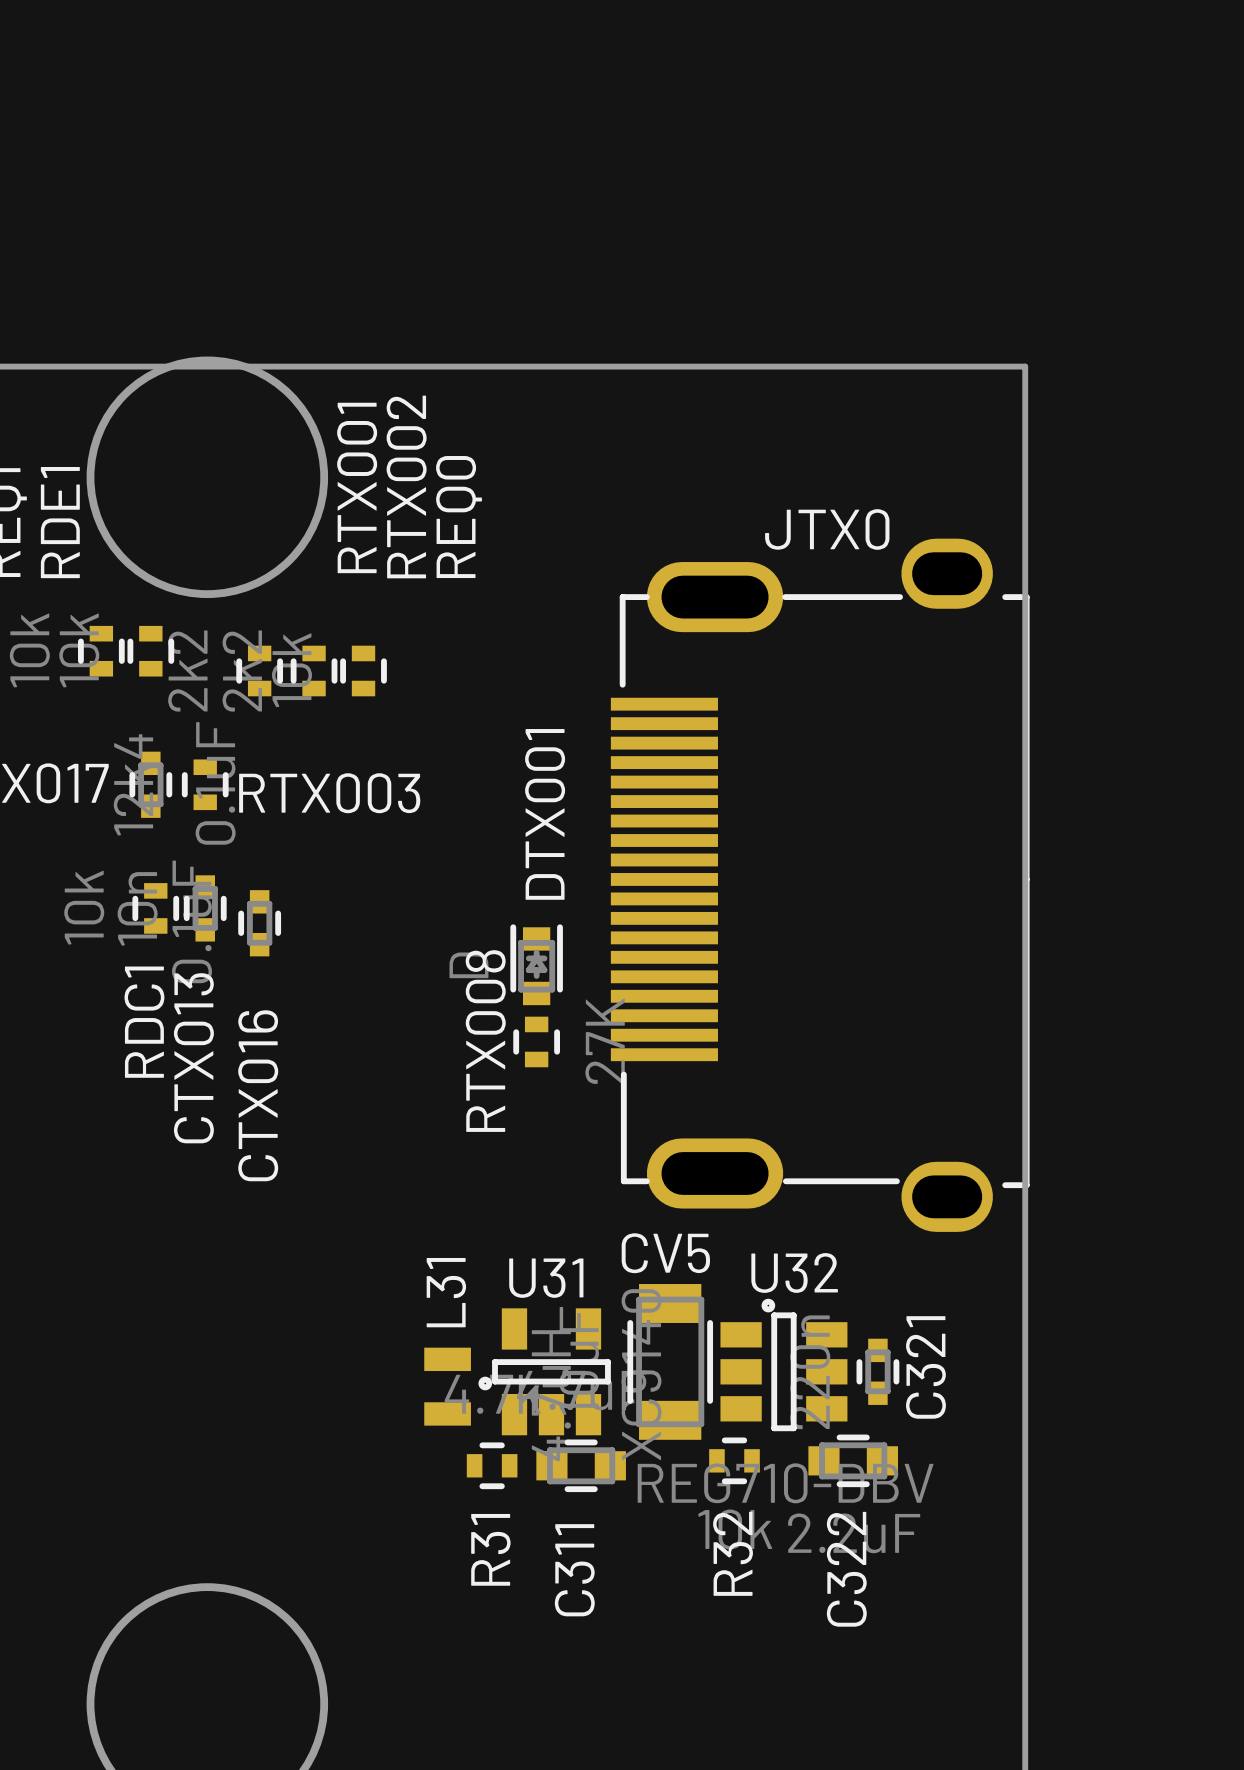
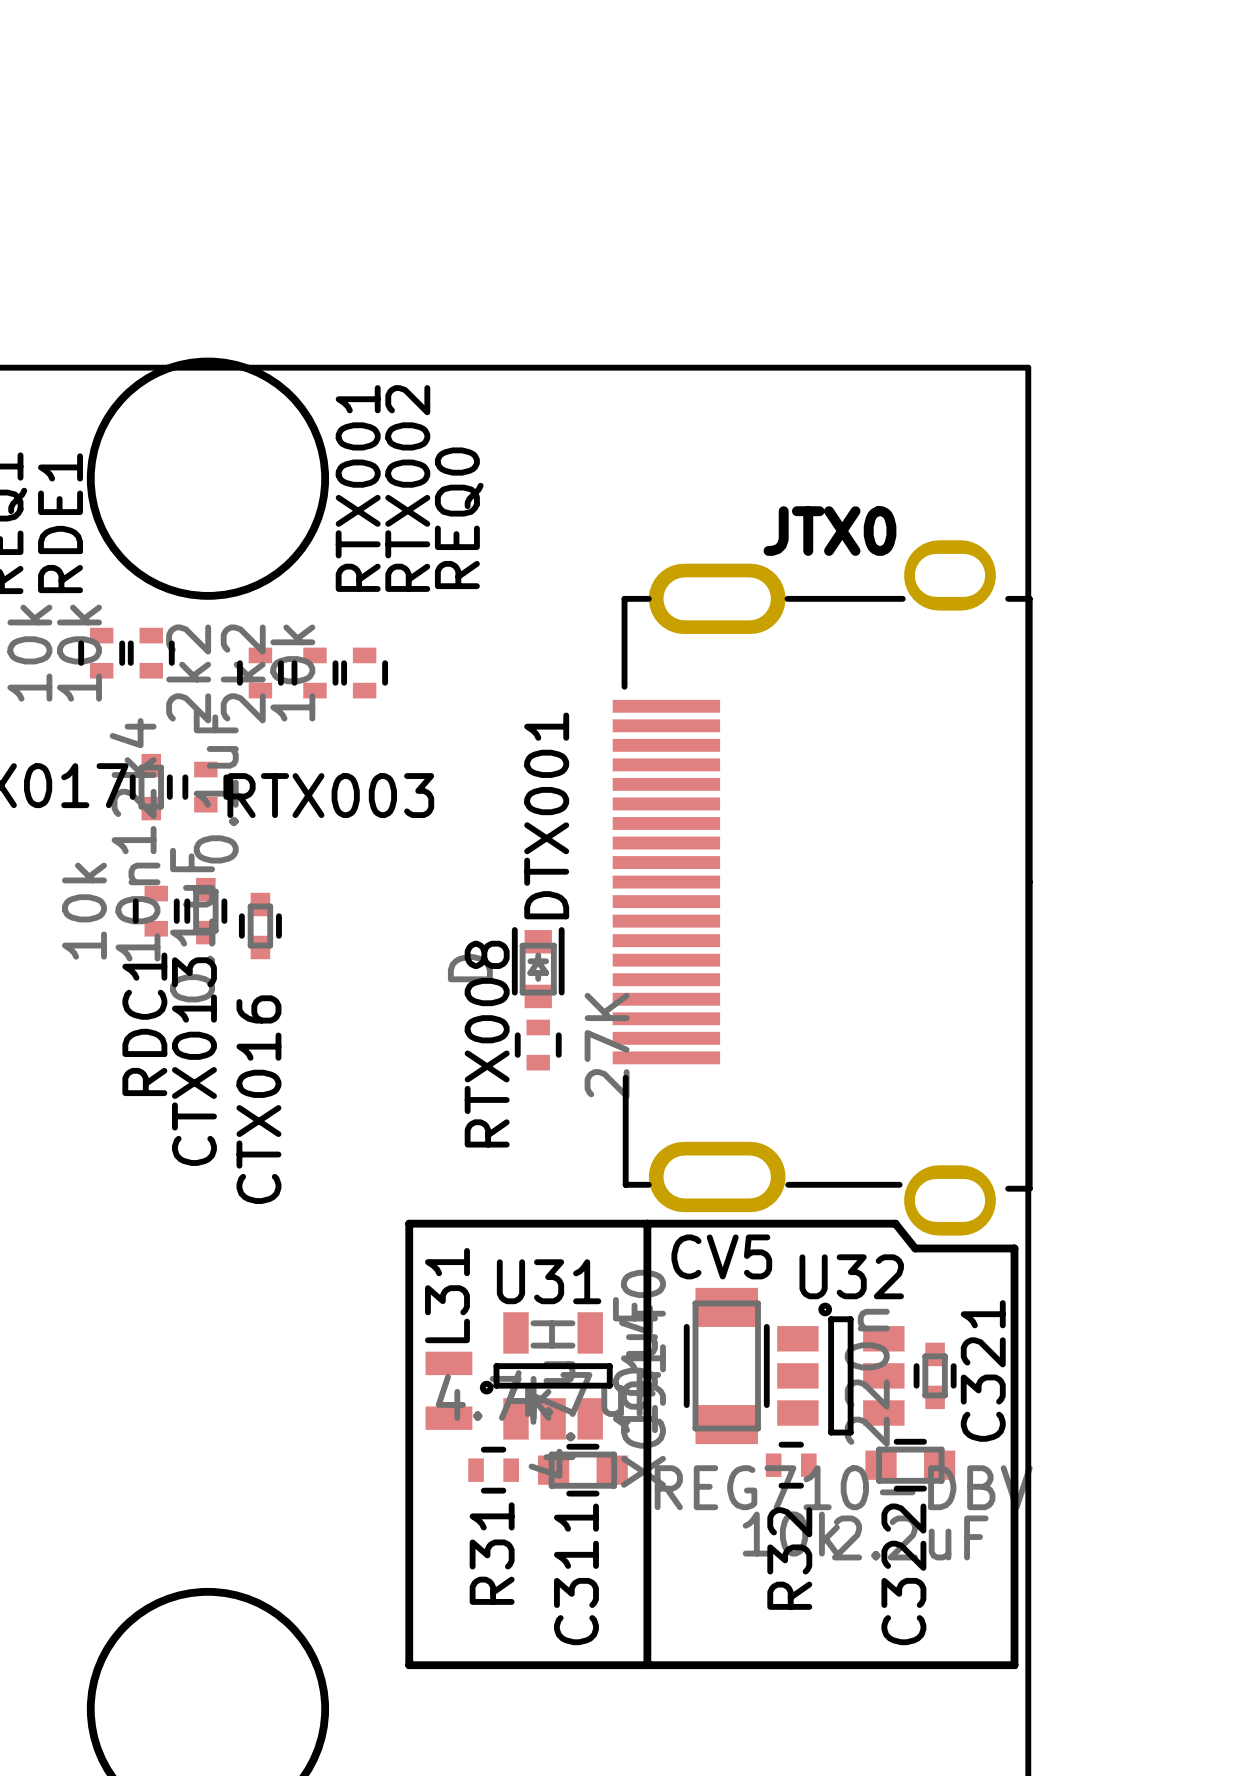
line: none -> (409, 1223) (409, 1665) (1014, 1665) (1014, 1248) (915, 1248) (895, 1223) (409, 1223)
line: none -> (647, 1223) (647, 1665)
CV5 position: (670, 1361) -> (726, 1365)
U32 position: (783, 1364) -> (840, 1369)
C321 position: (877, 1371) -> (935, 1375)
R32 position: (734, 1460) -> (791, 1465)
C322 position: (853, 1460) -> (910, 1465)

